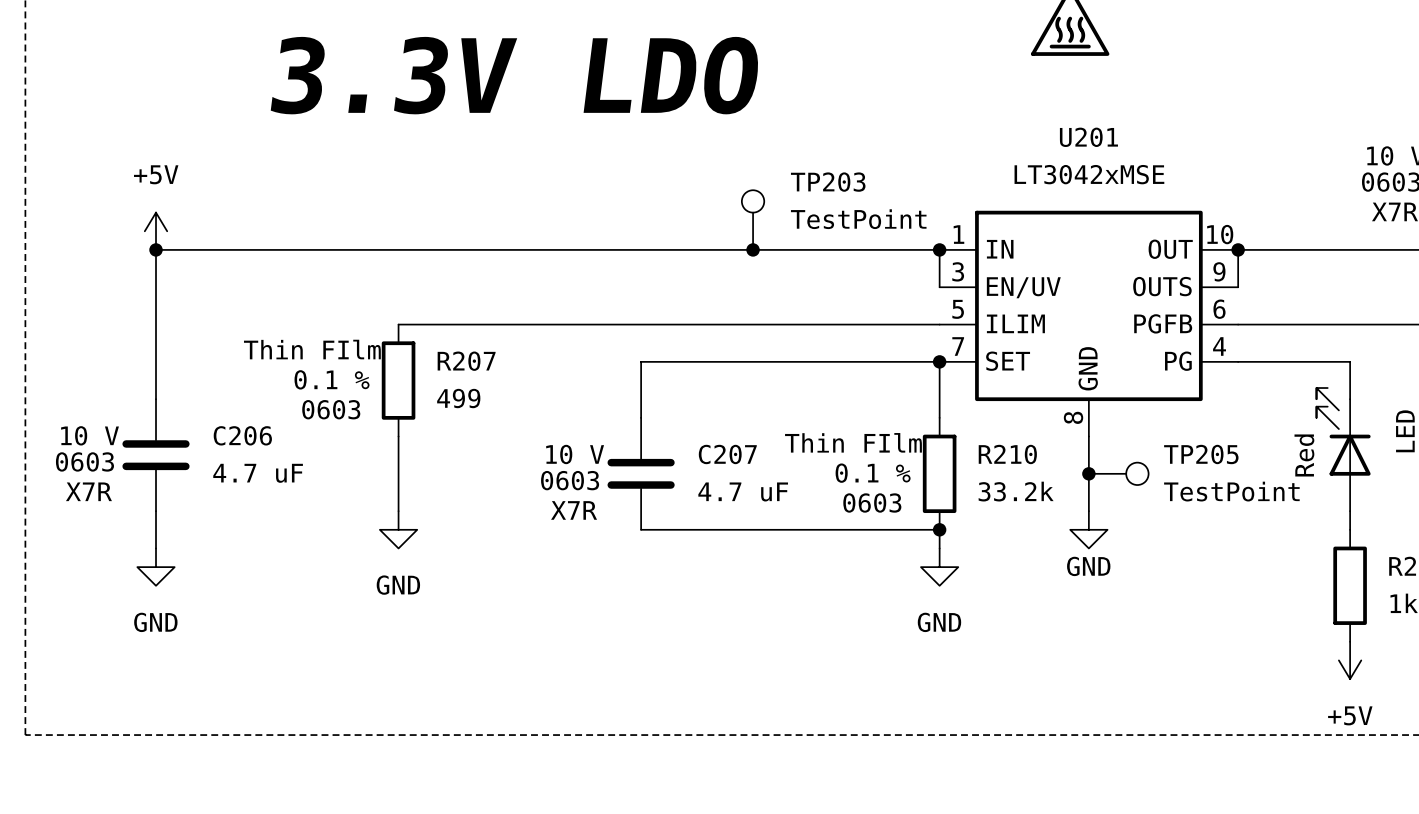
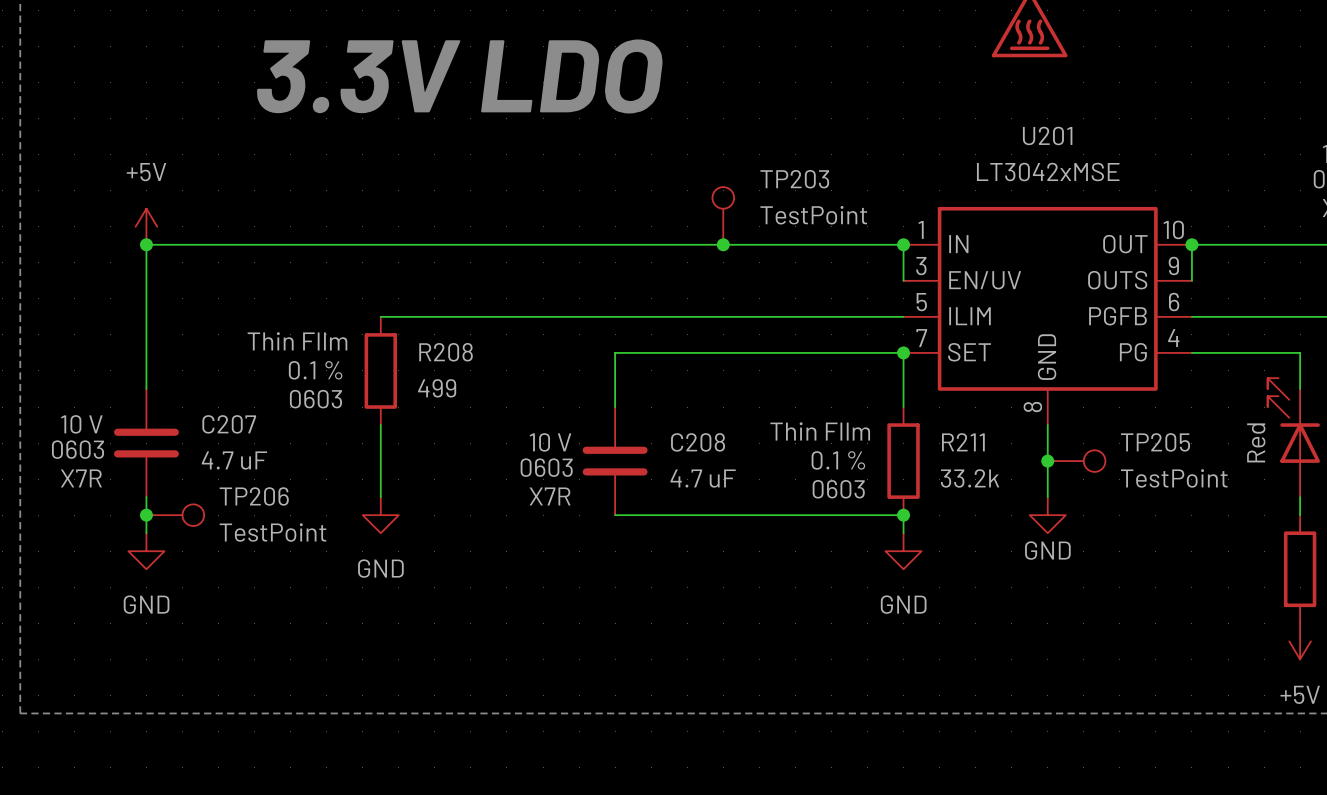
R207 name: R207 (466, 361) -> R208 (446, 352)
C206 name: C206 (242, 435) -> C207 (229, 424)
C207 name: C207 (727, 454) -> C208 (698, 442)
R210 name: R210 (1007, 454) -> R211 (963, 442)
junction: none -> (146, 515)
TP206: none -> TestPoint (175, 515)

